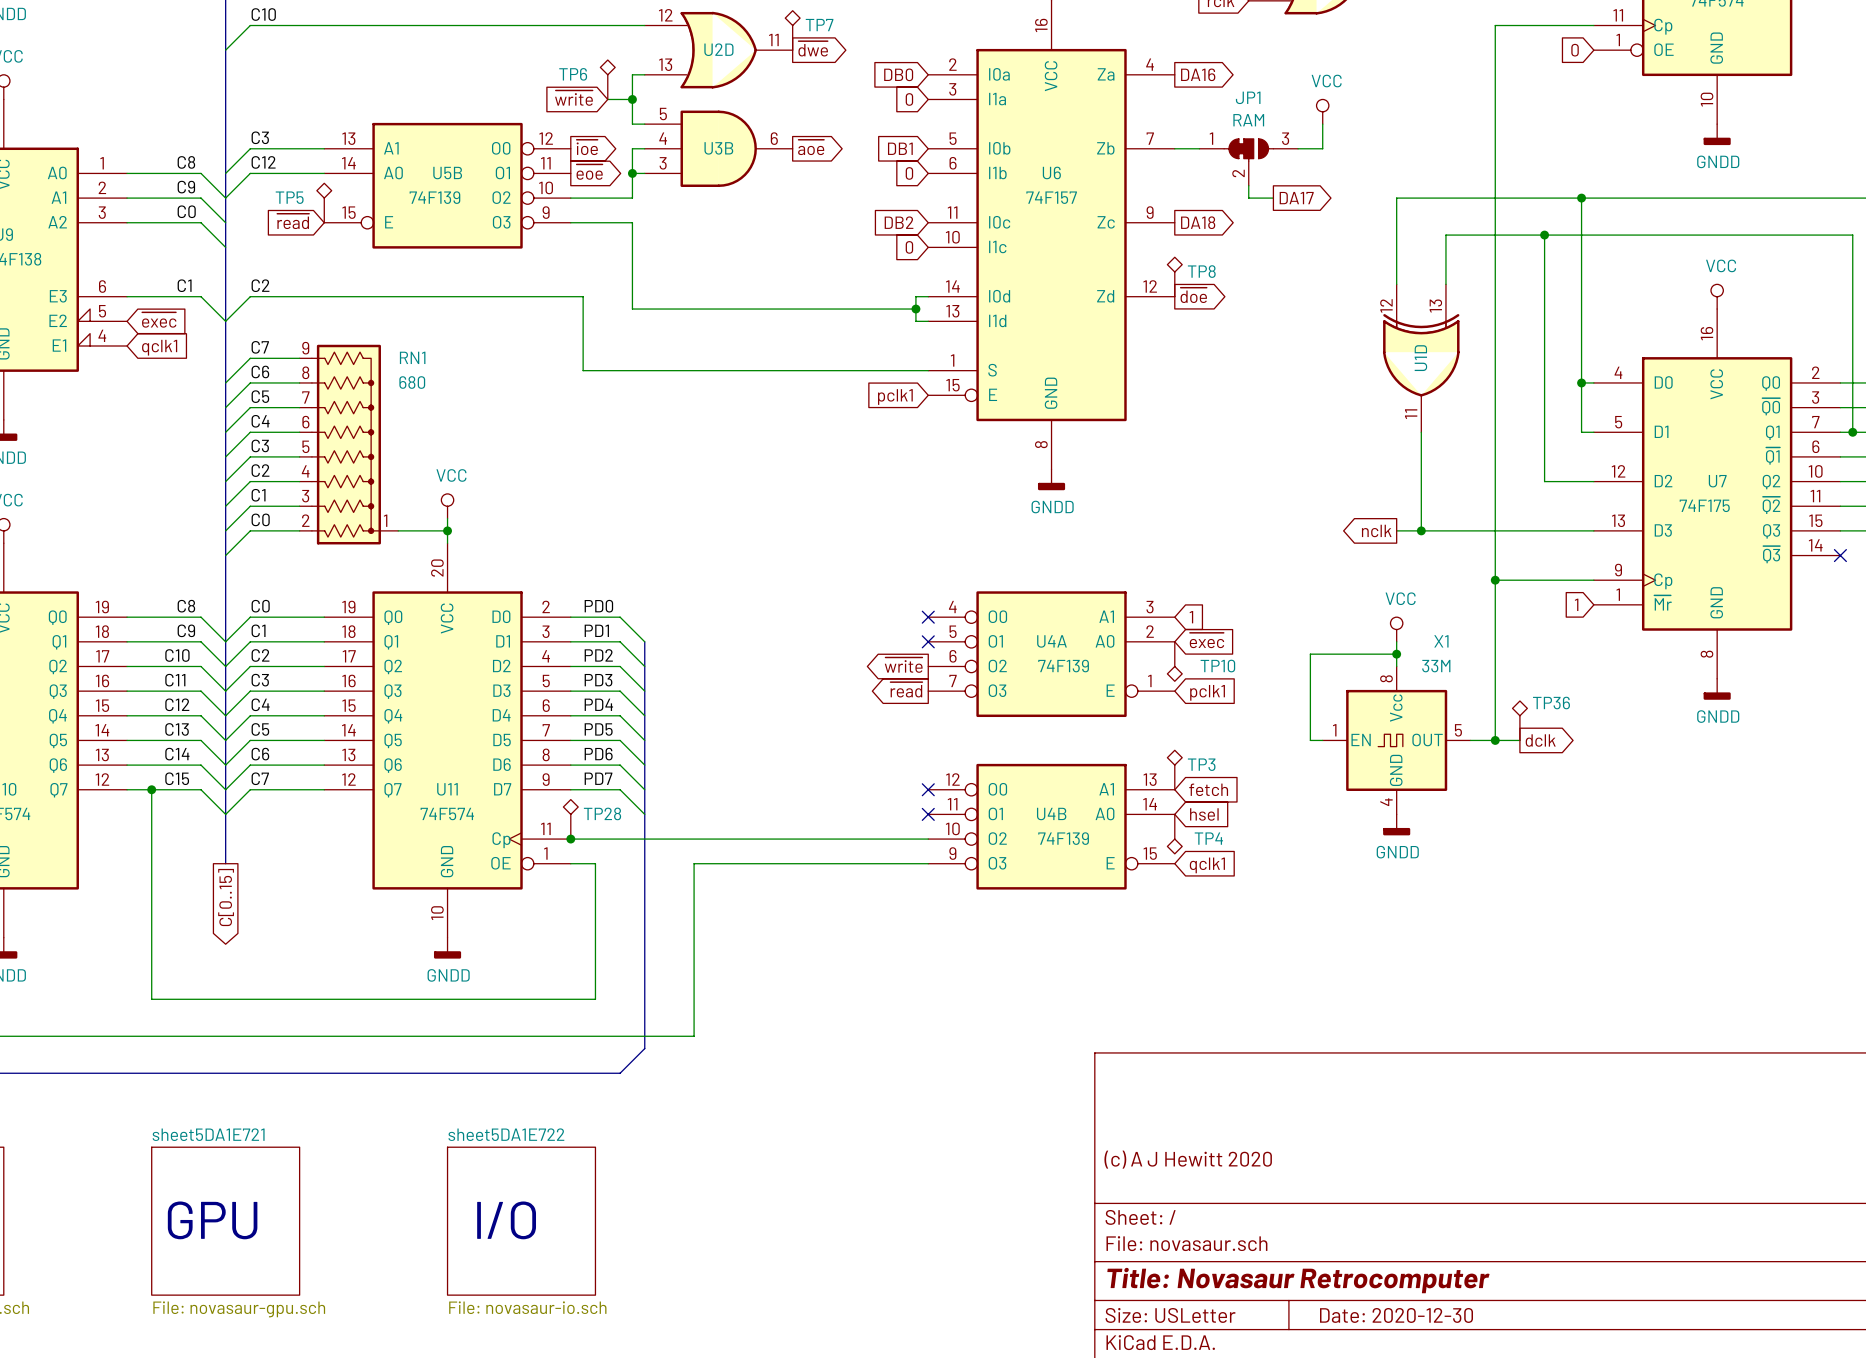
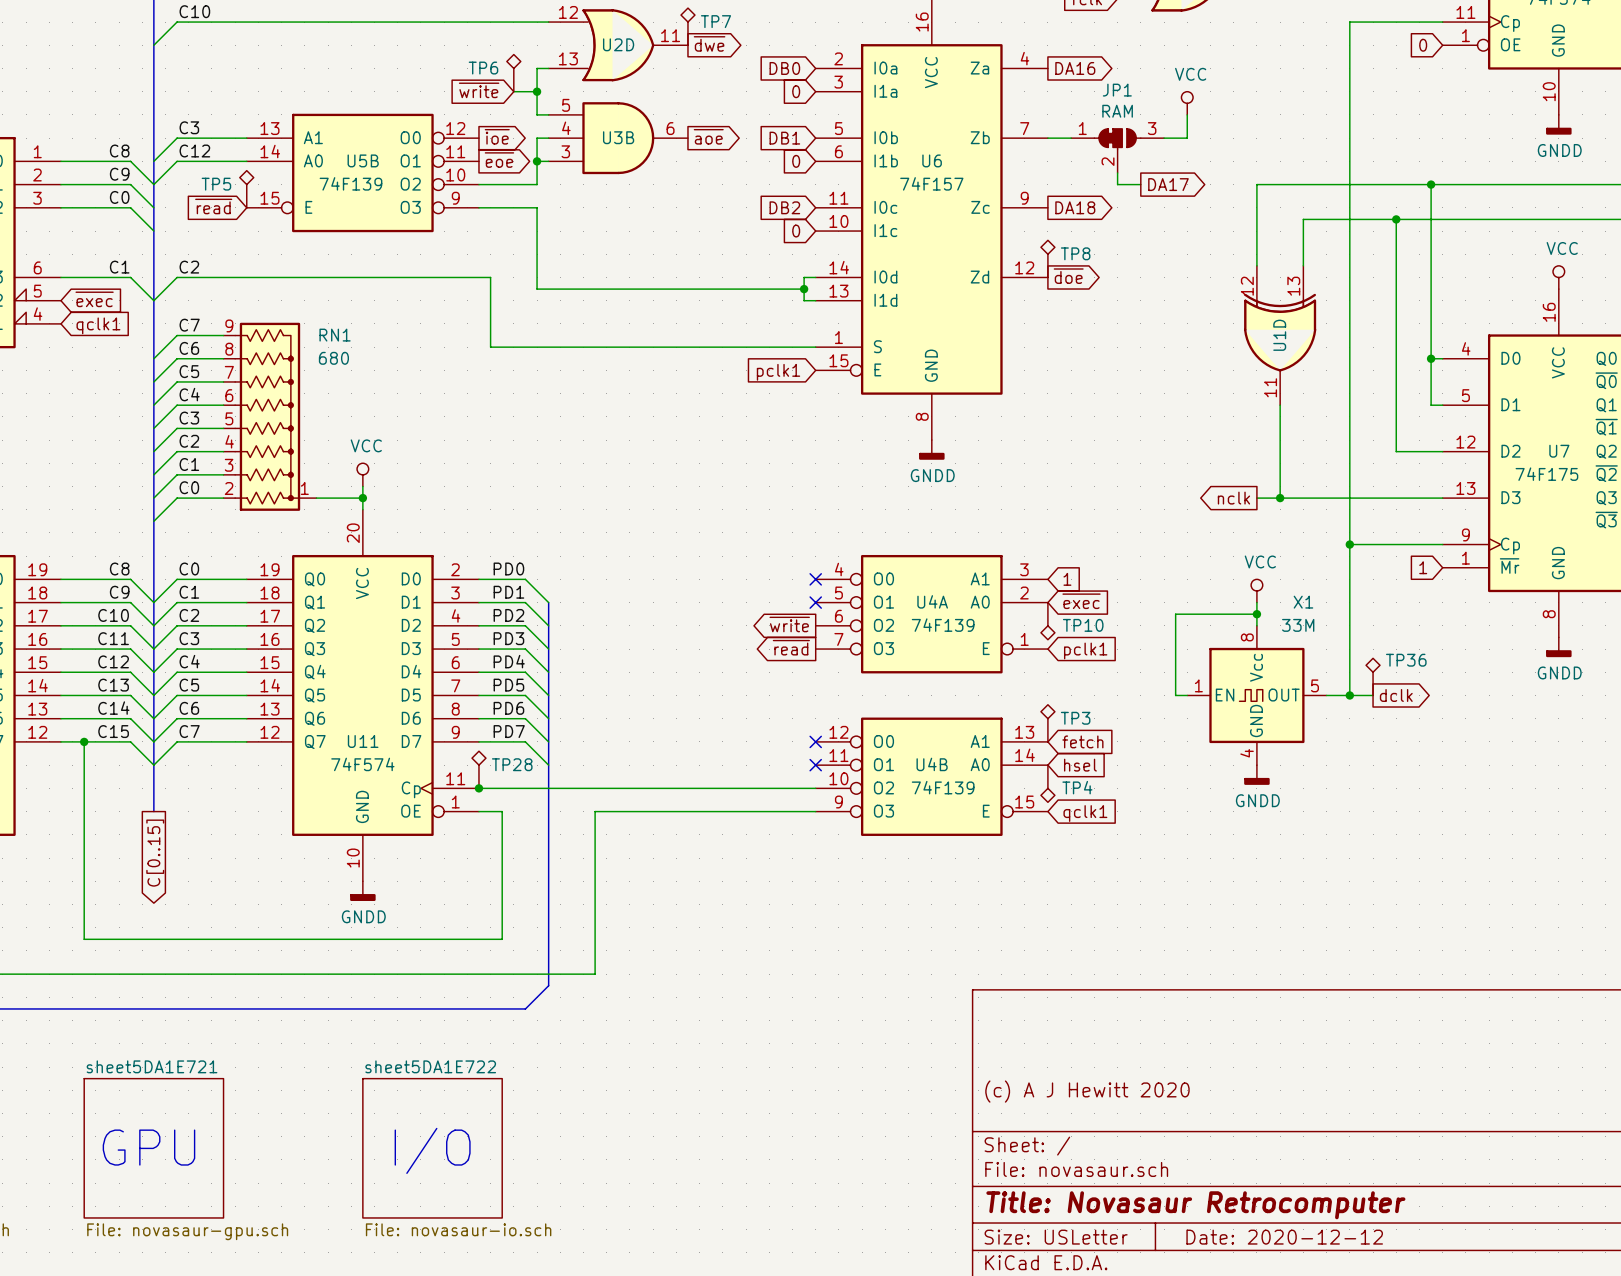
title block: Date: 2020-12-30 (1396, 1315) -> Date: 2020-12-12 (1284, 1237)

